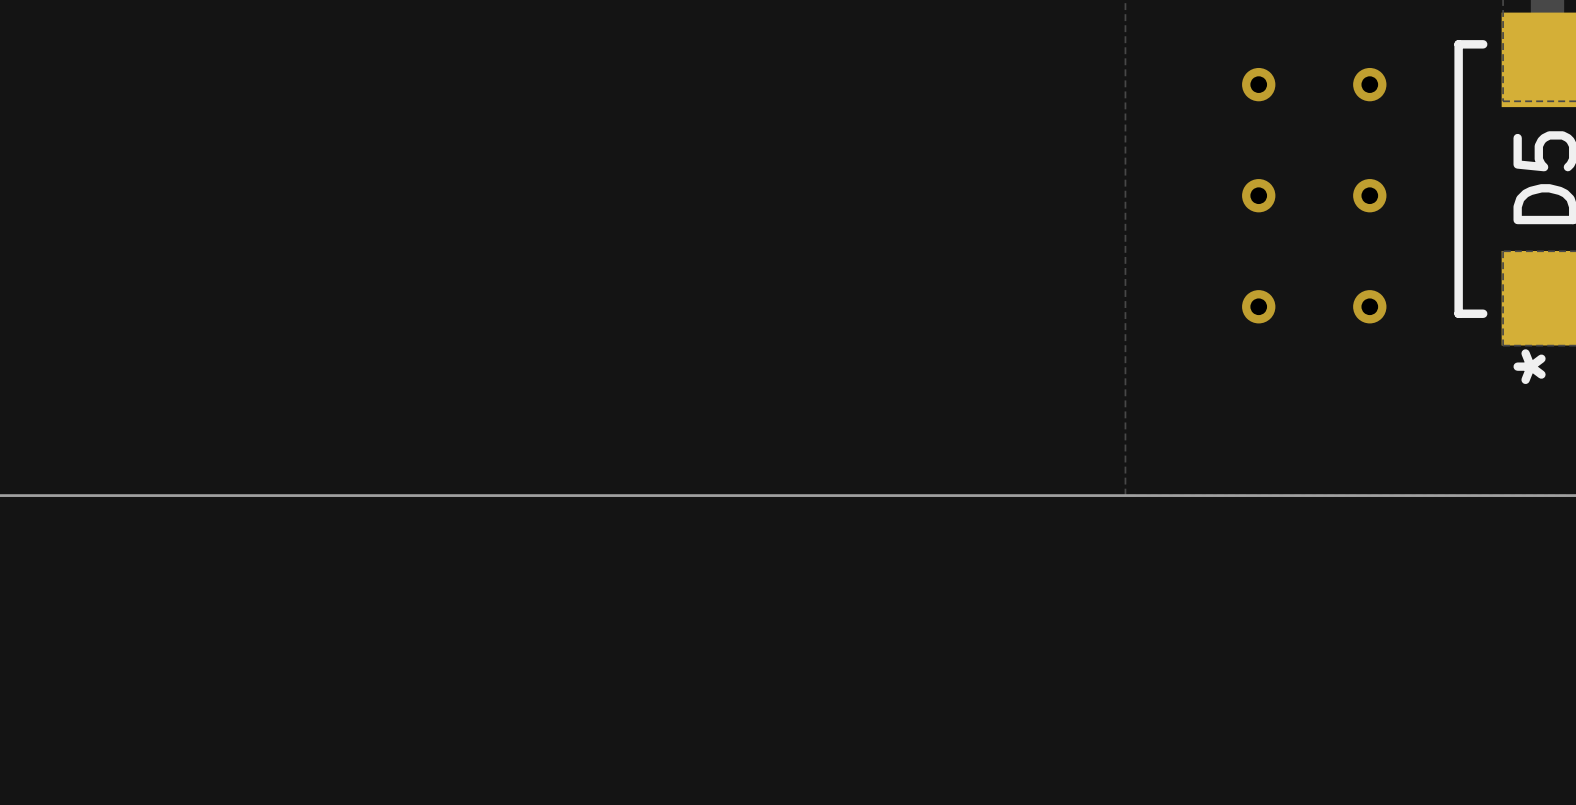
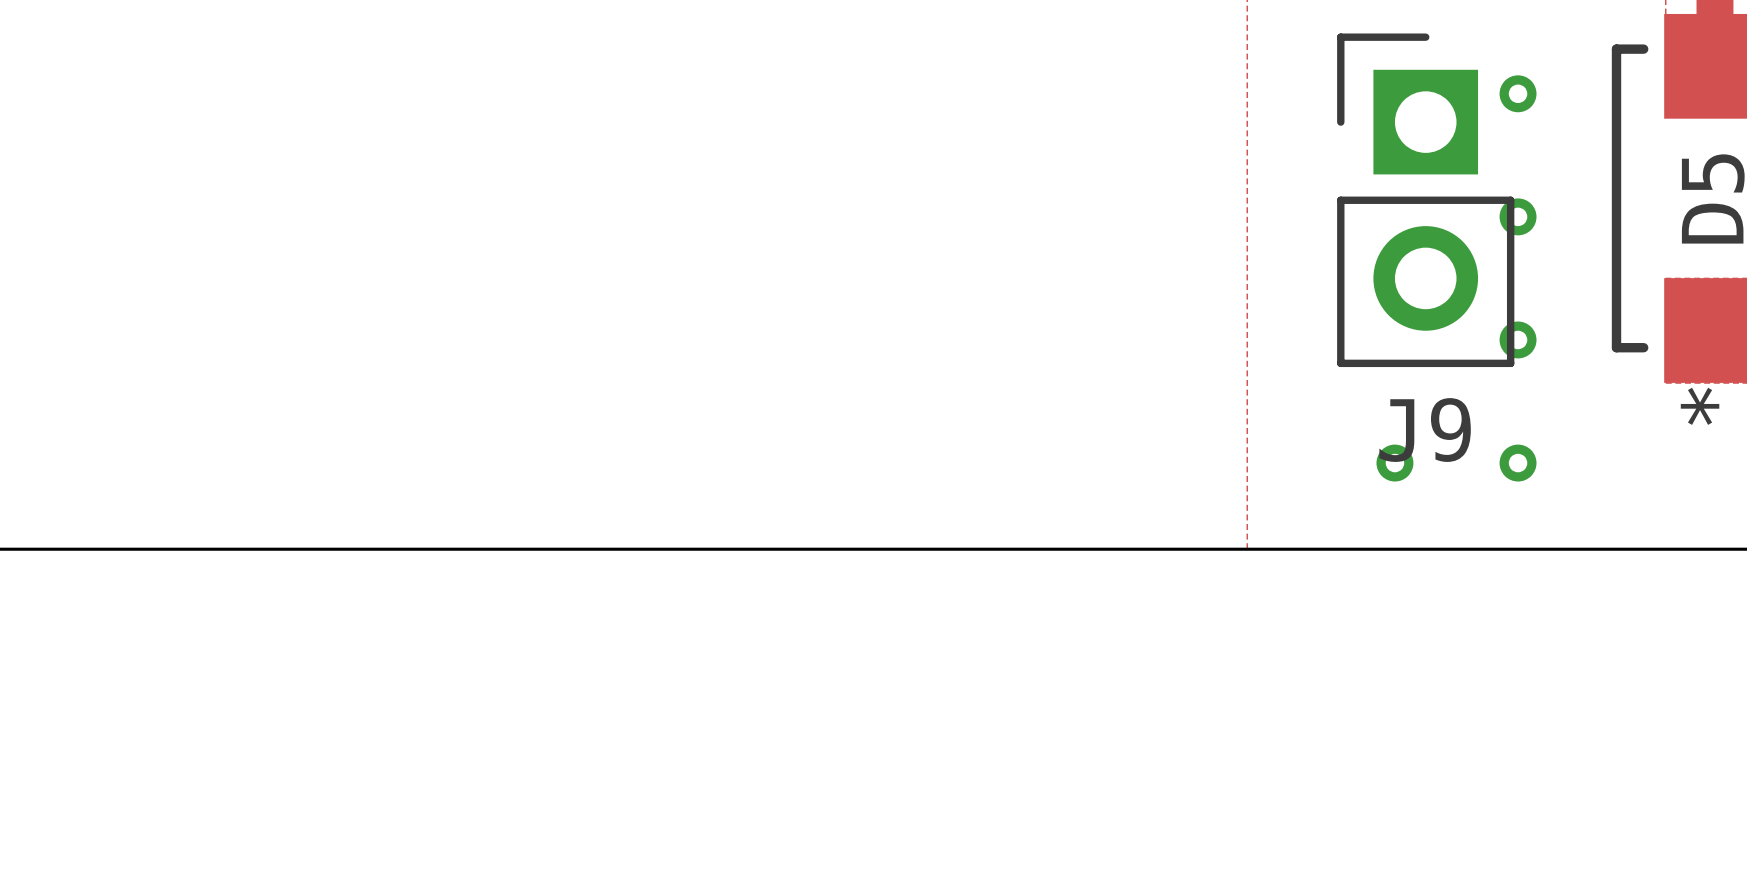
via: (1258, 84) -> none
J9: none -> (1425, 200)
via: (1258, 195) -> none
via: (1258, 306) -> none
via: none -> (1394, 463)
via: none -> (1518, 463)

